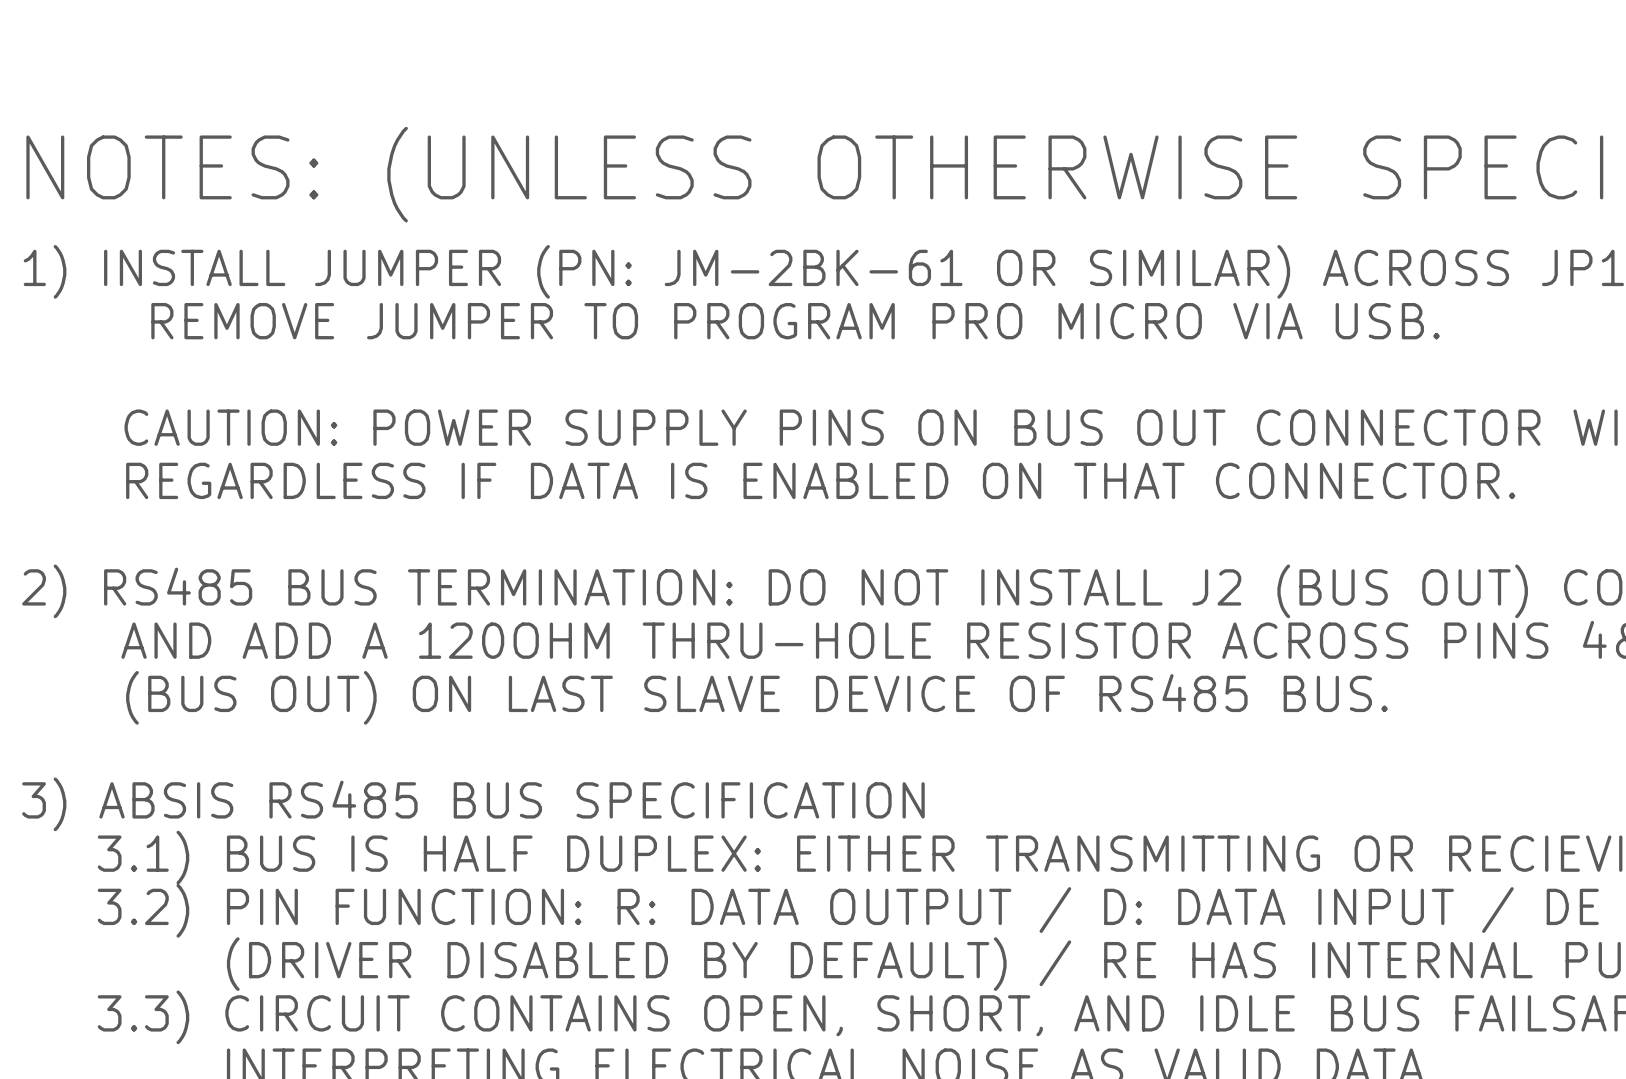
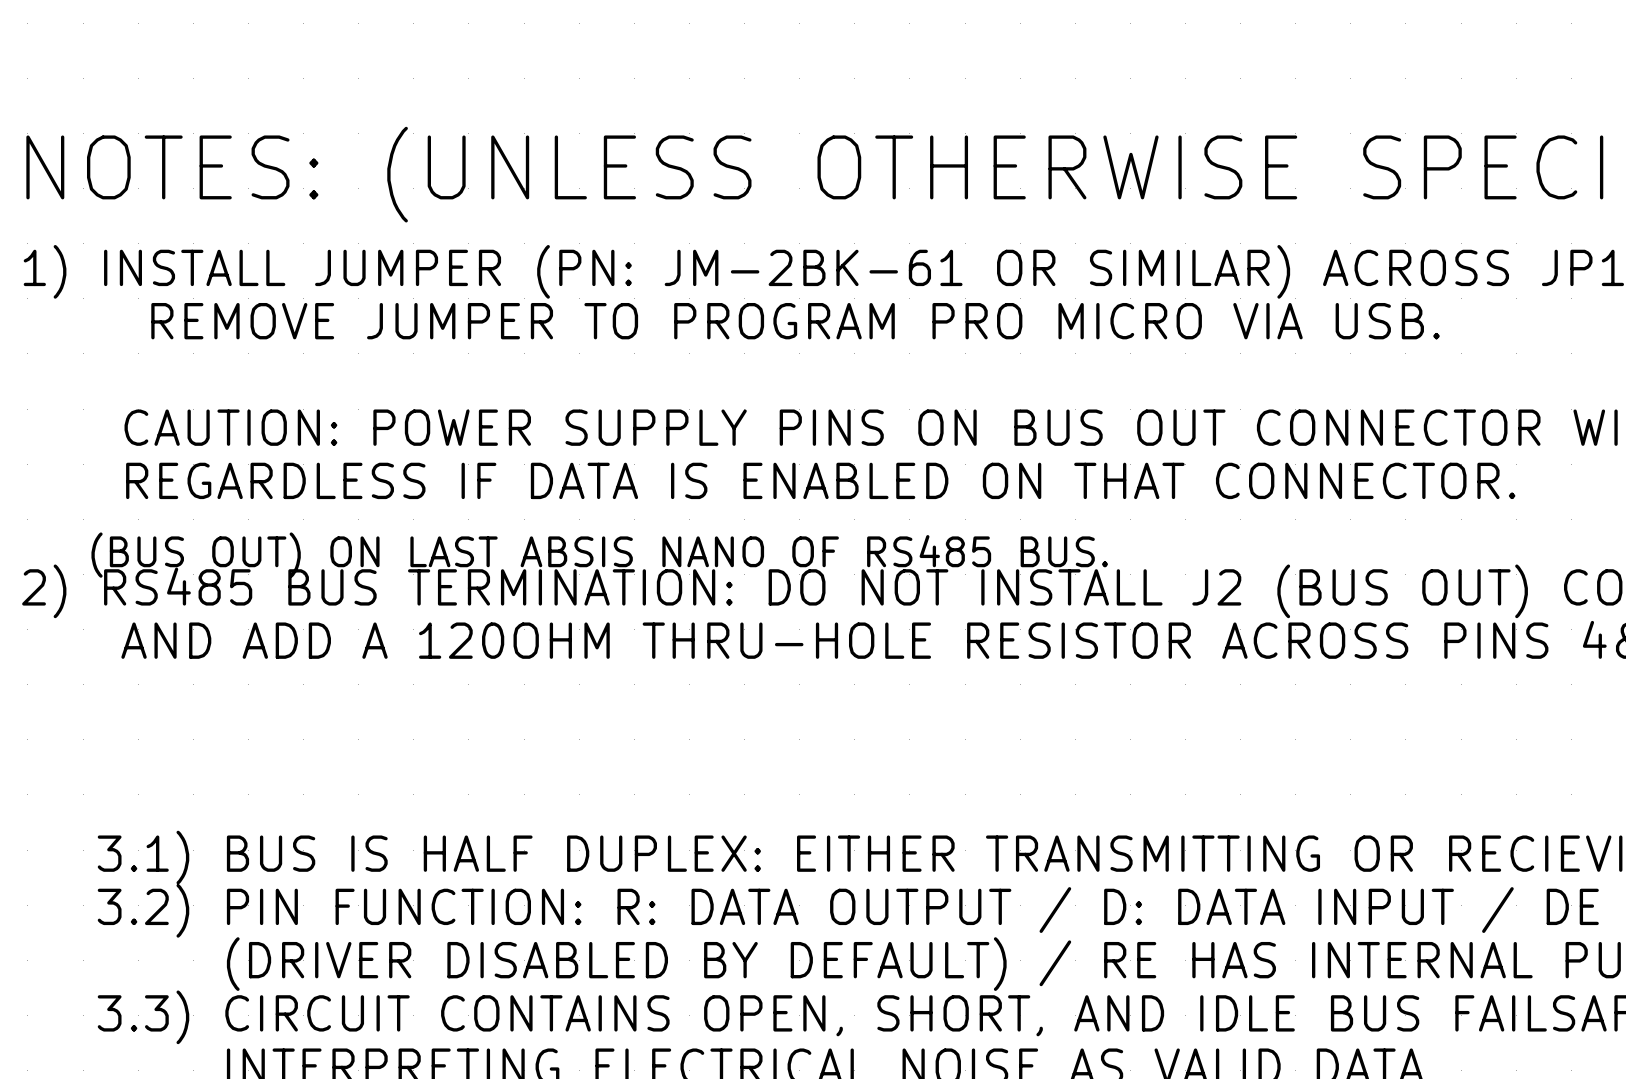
text: none -> (BUS OUT) ON LAST ABSIS NANO OF RS485 BUS. (599, 555)
text: (BUS OUT) ON LAST SLAVE DEVICE OF RS485 BUS. (756, 697) -> none
text: 3) ABSIS RS485 BUS SPECIFICATION (473, 804) -> none

